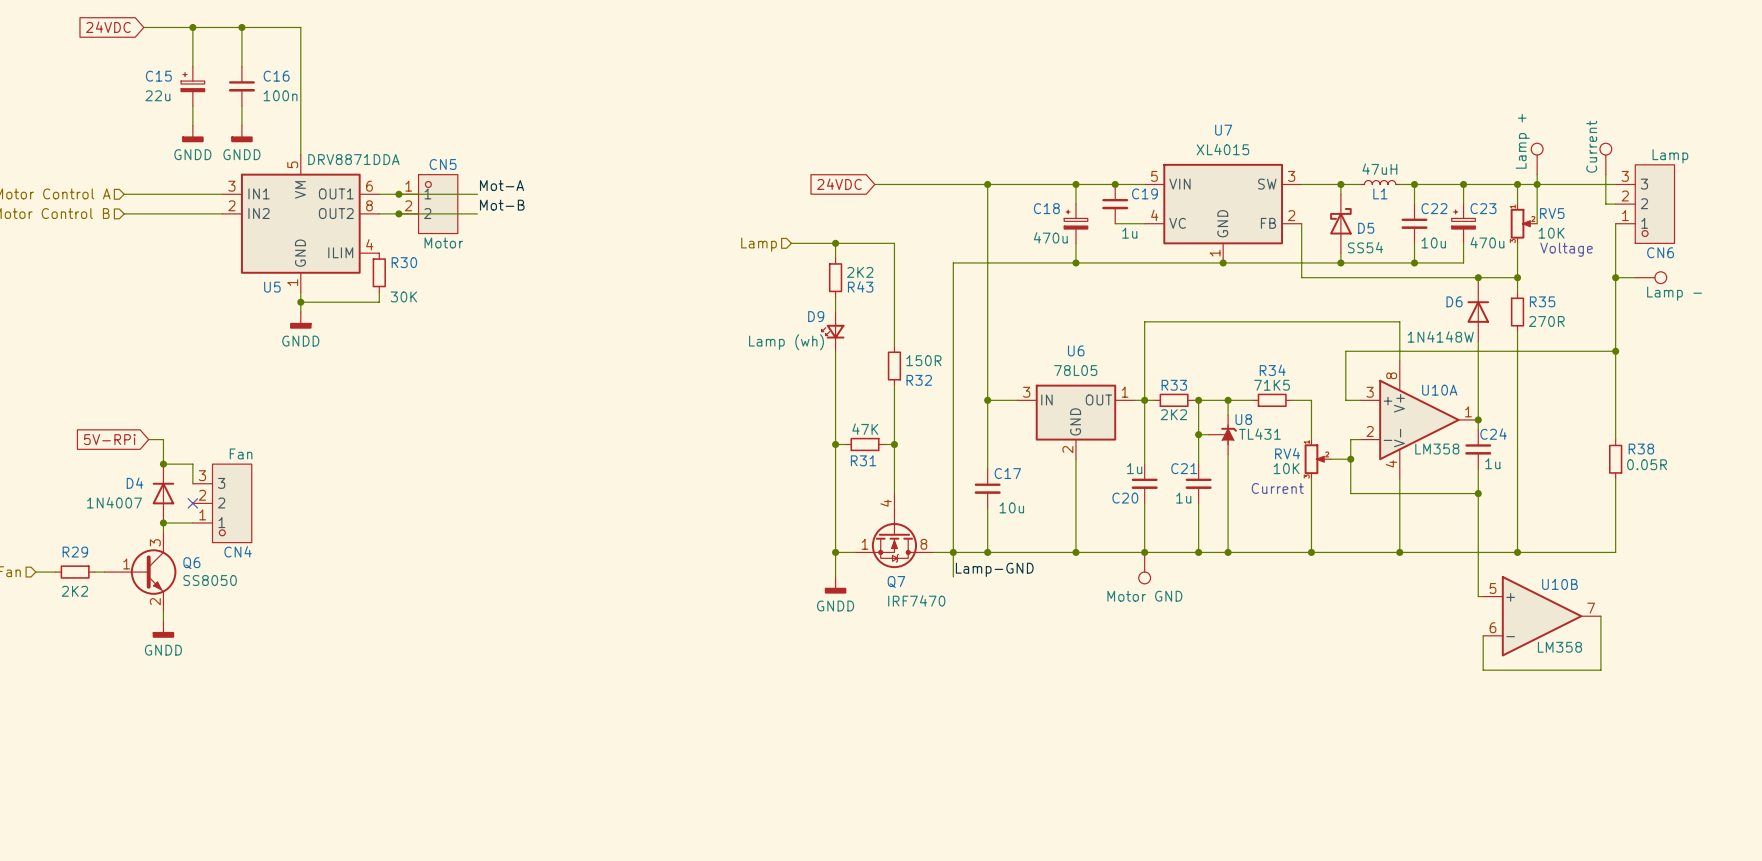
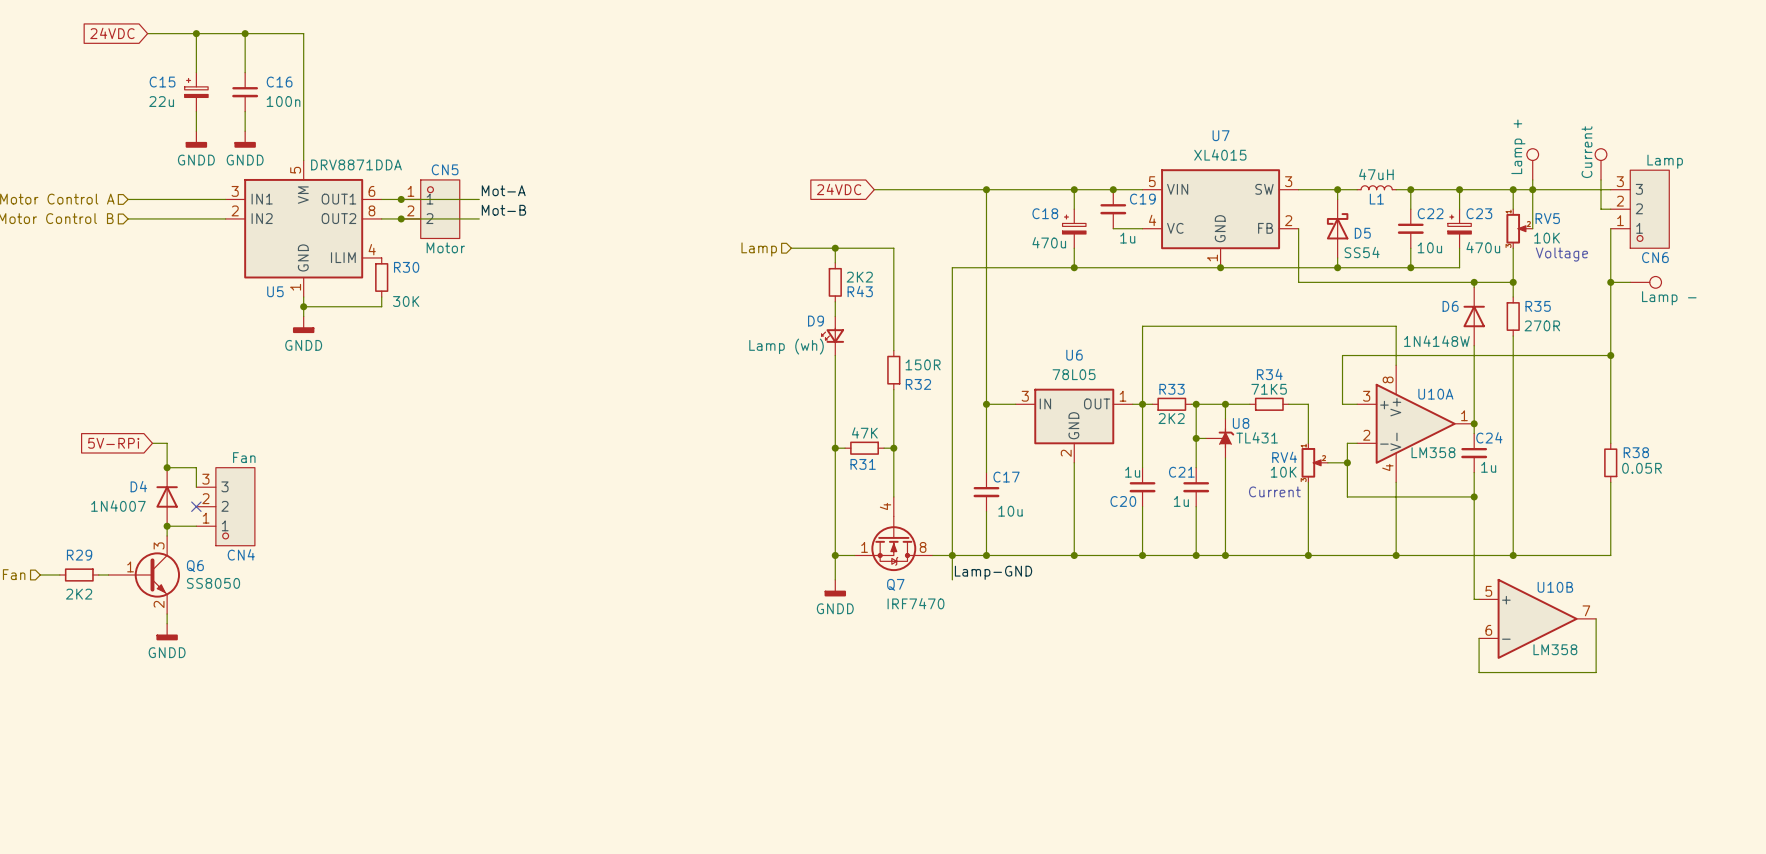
part: (1144, 568) -> none

